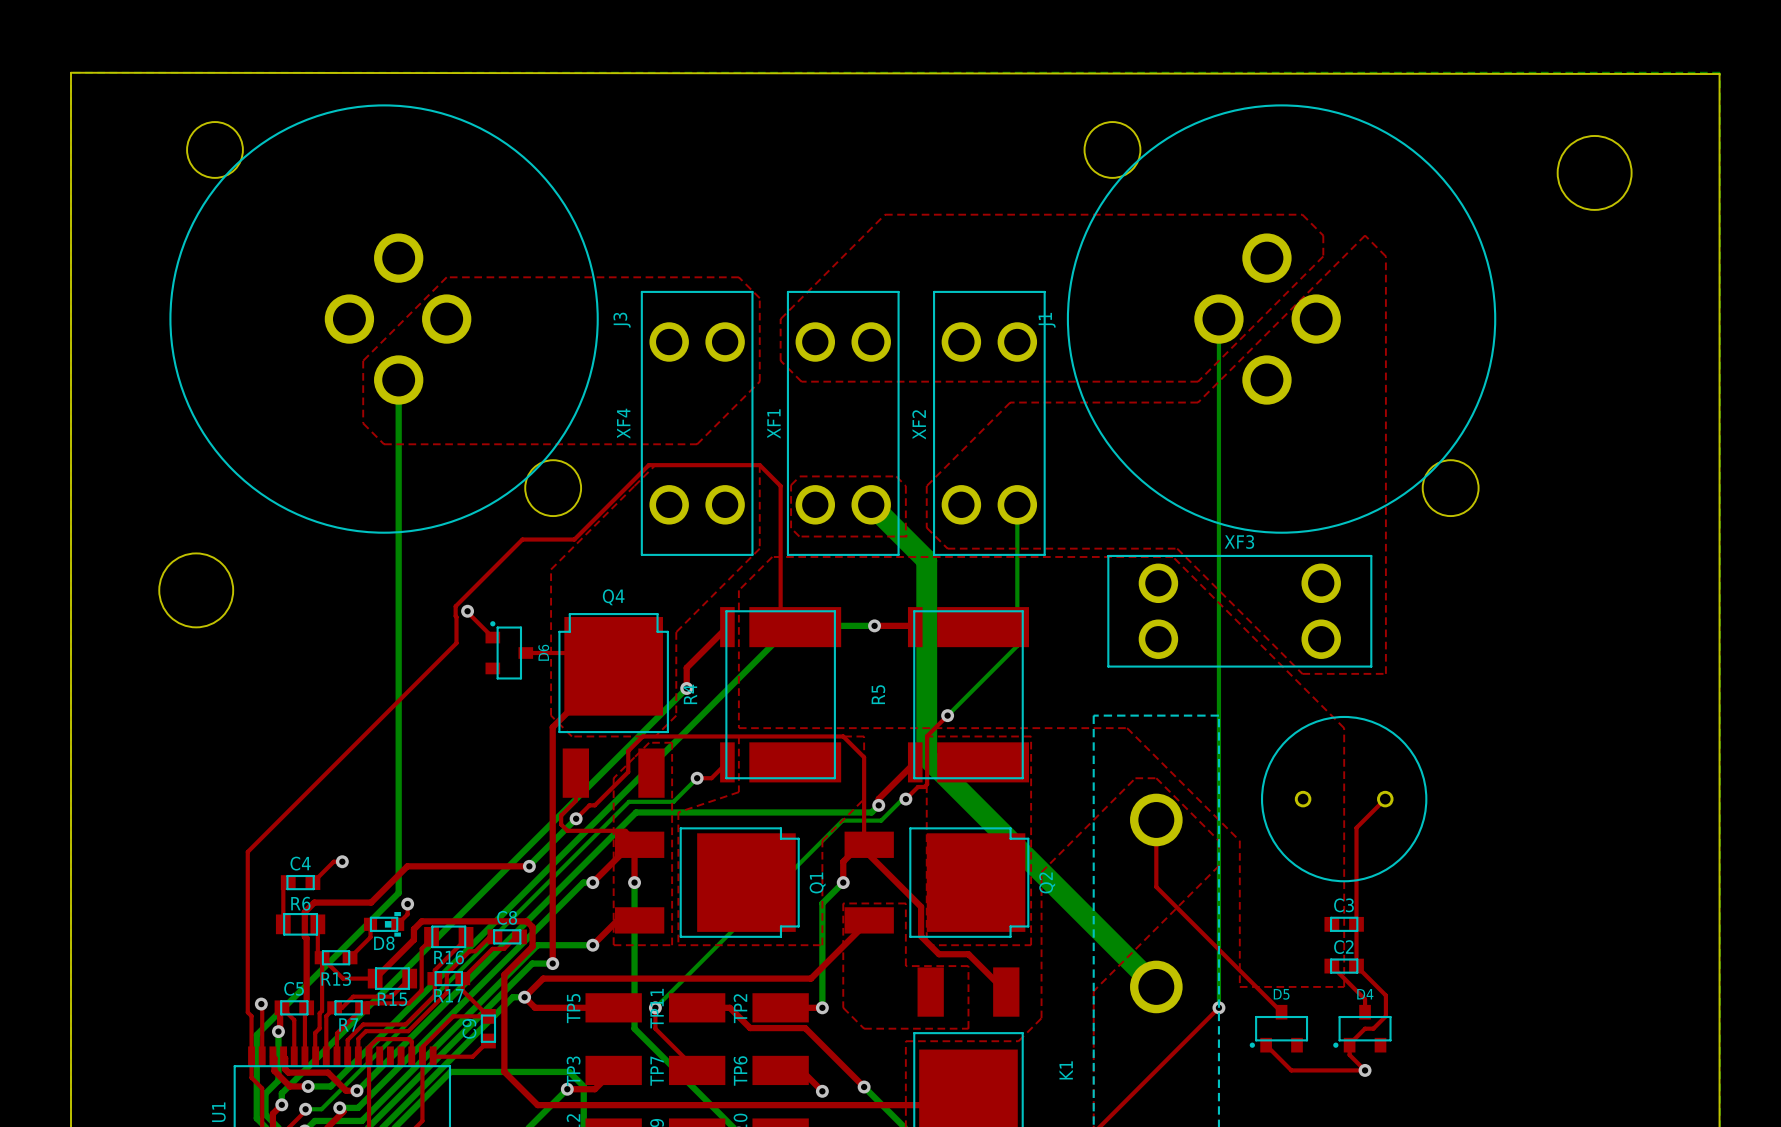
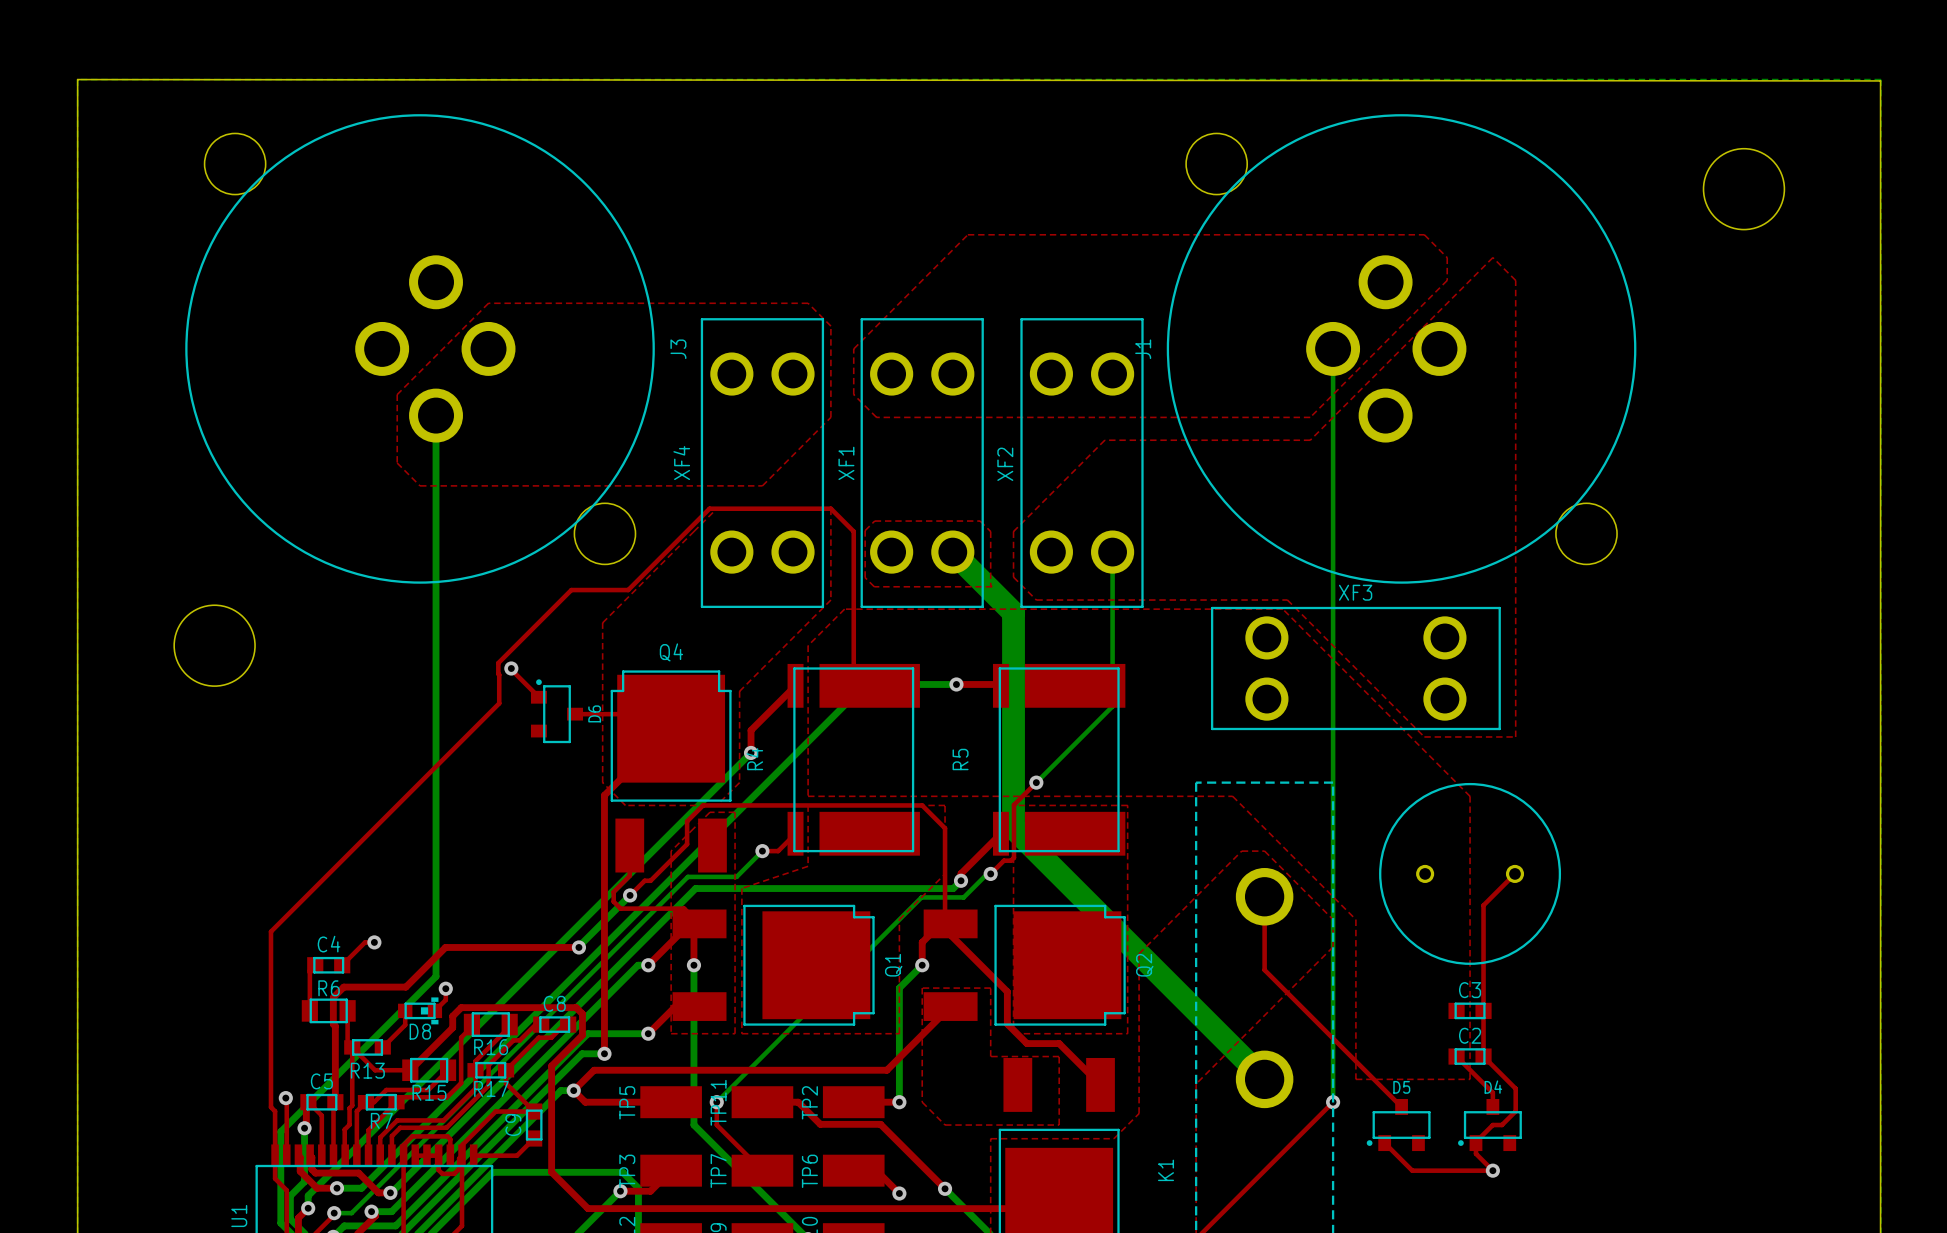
top track: none -> (415, 1155) (438, 1155) (438, 1170) (442, 1173) (454, 1173) (459, 1168) (459, 1158) (462, 1155)

